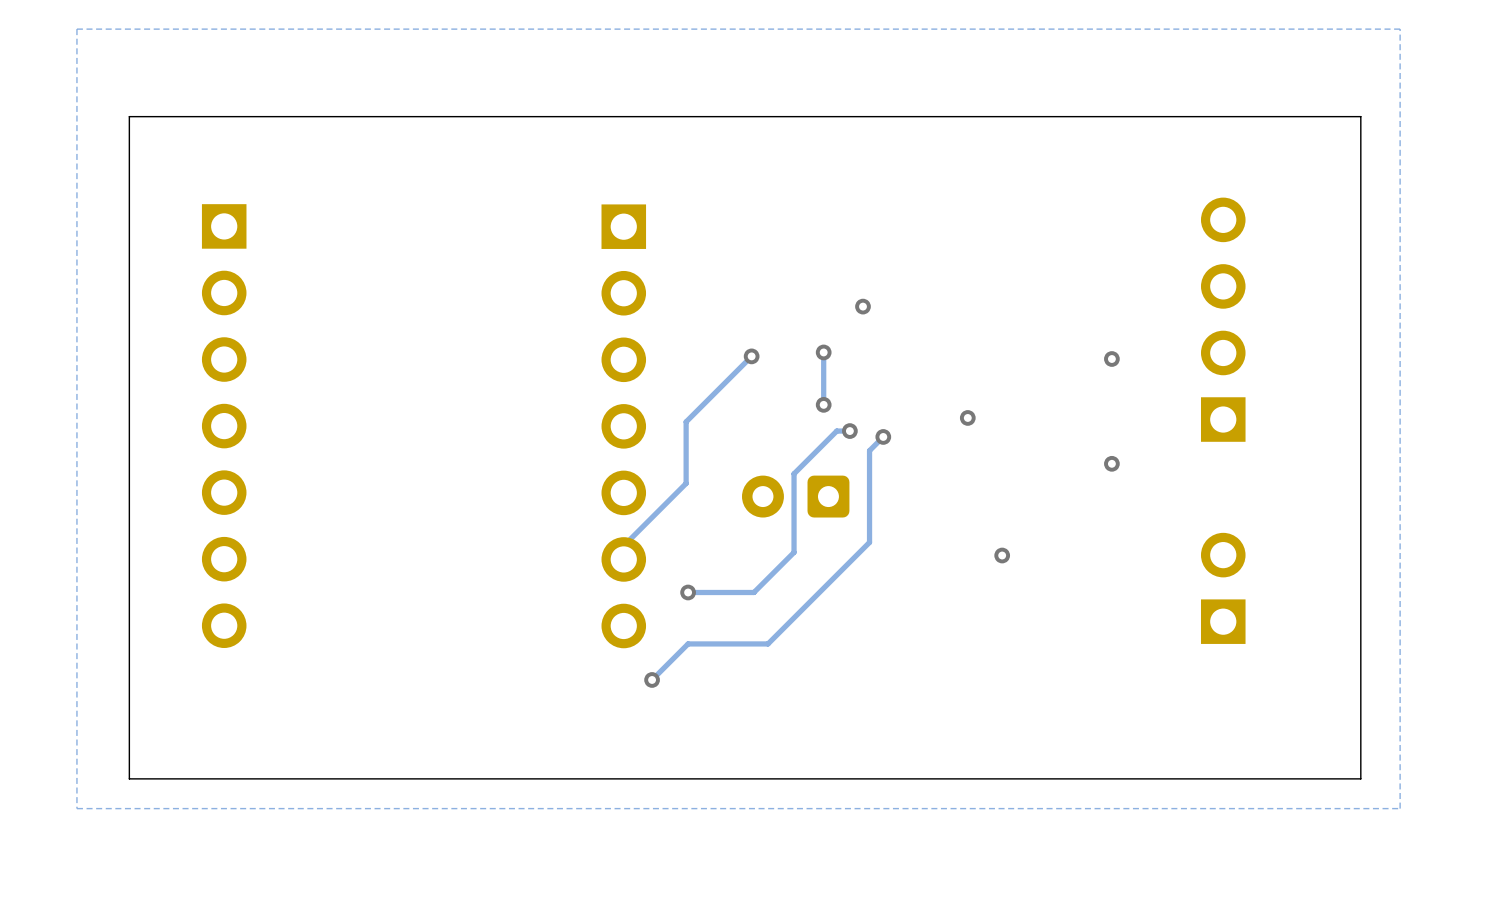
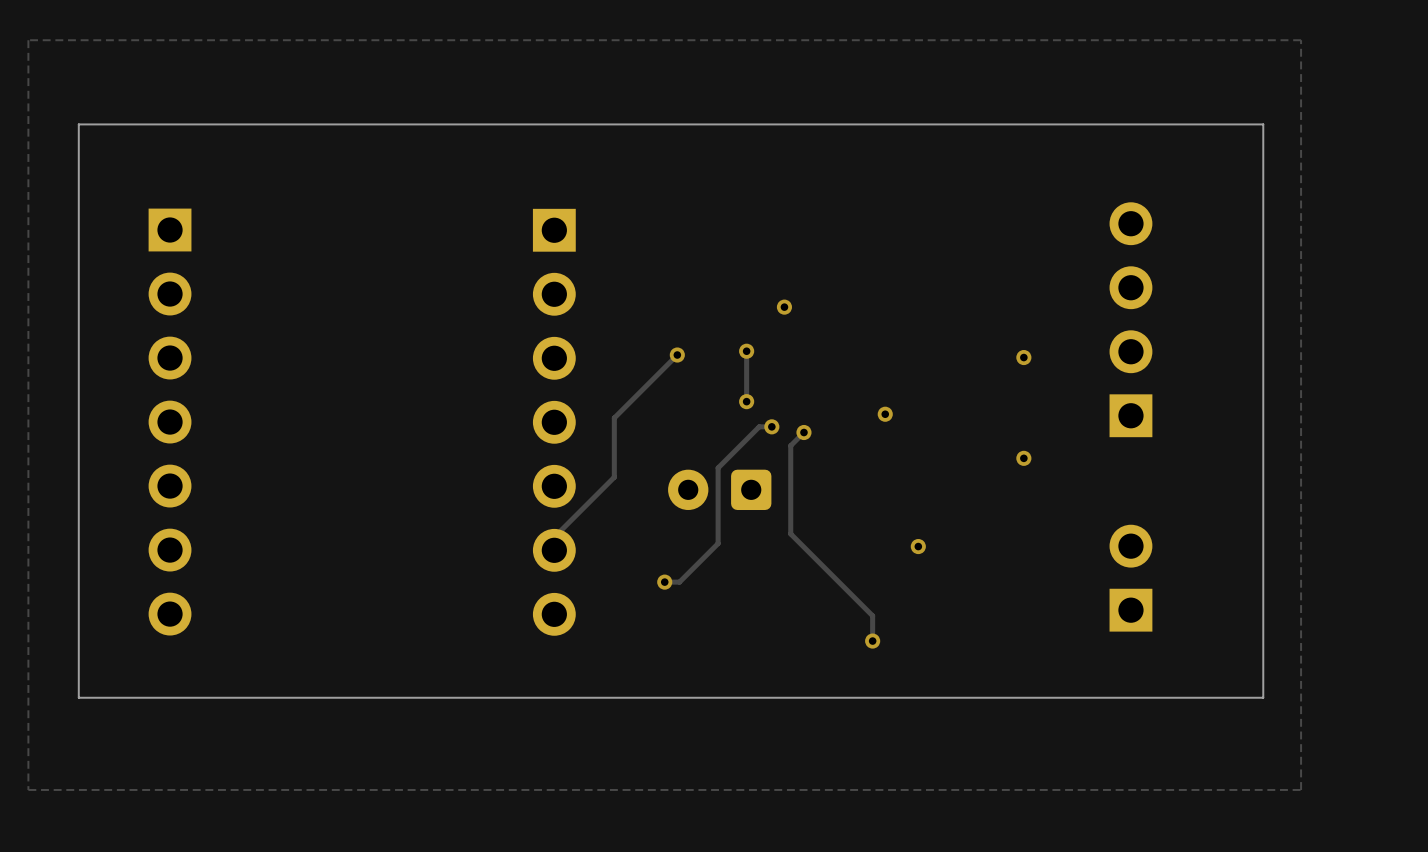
track: (869, 542) (768, 643) (688, 643) (652, 679) -> (790, 533) (872, 615) (872, 641)
via position: (688, 592) -> (664, 582)
track: (738, 592) (688, 592) -> none
via: none -> (872, 641)
via: (652, 679) -> none
board edge: (1360, 712) (1360, 778) (129, 778) (129, 712) -> (1263, 697) (78, 697)

